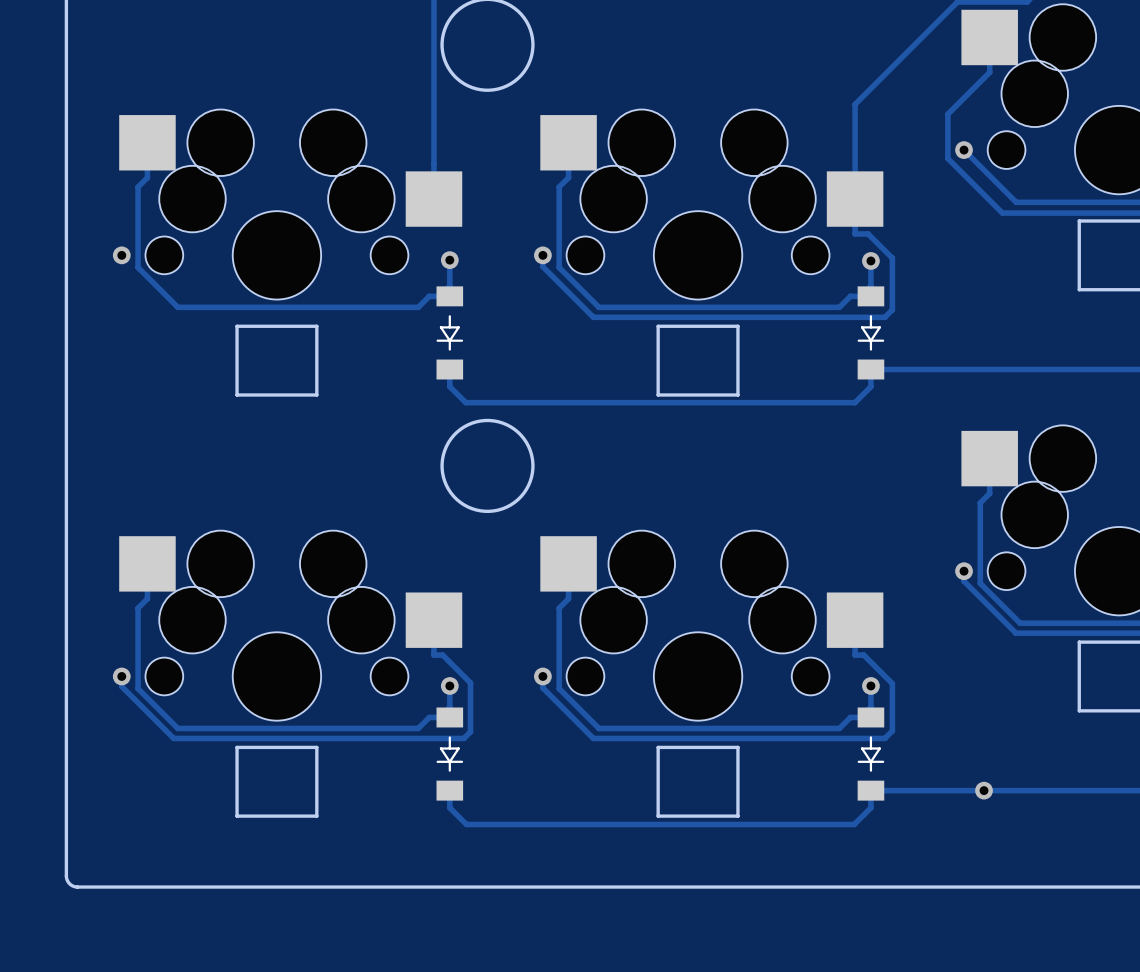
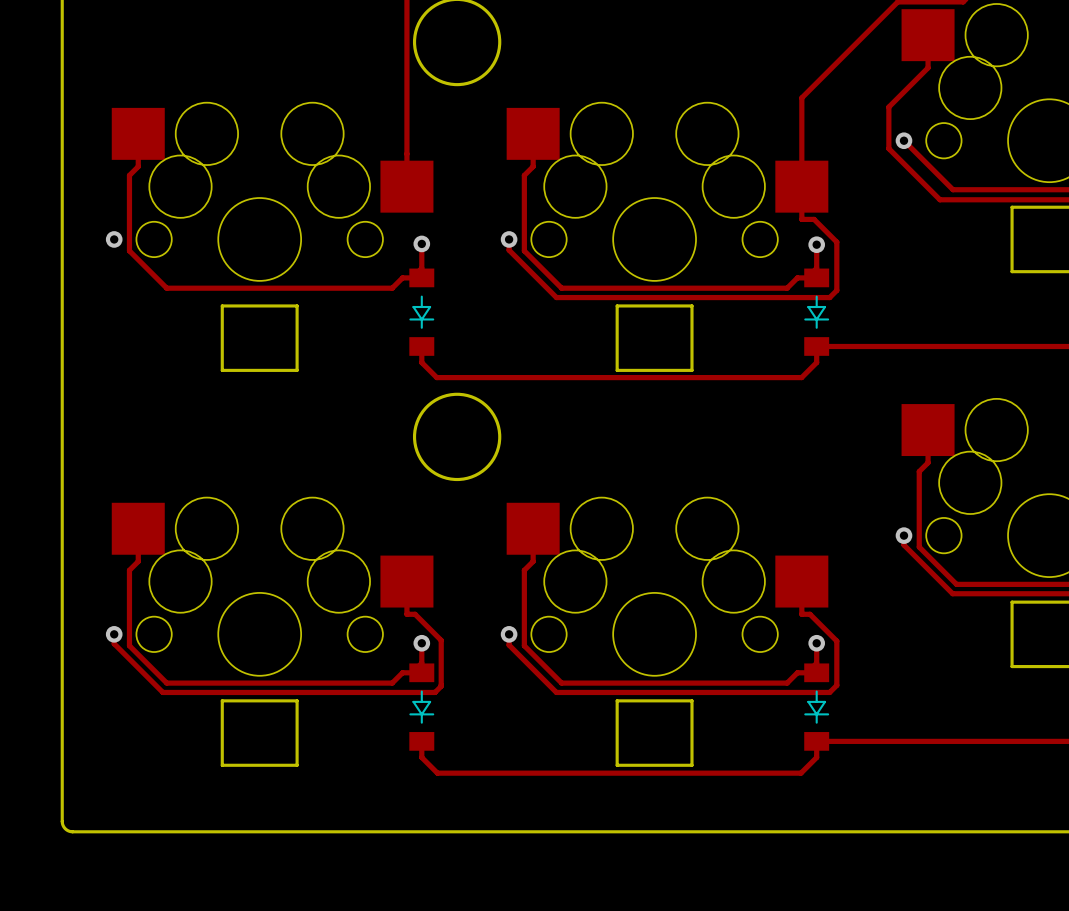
via: (984, 790) -> none

